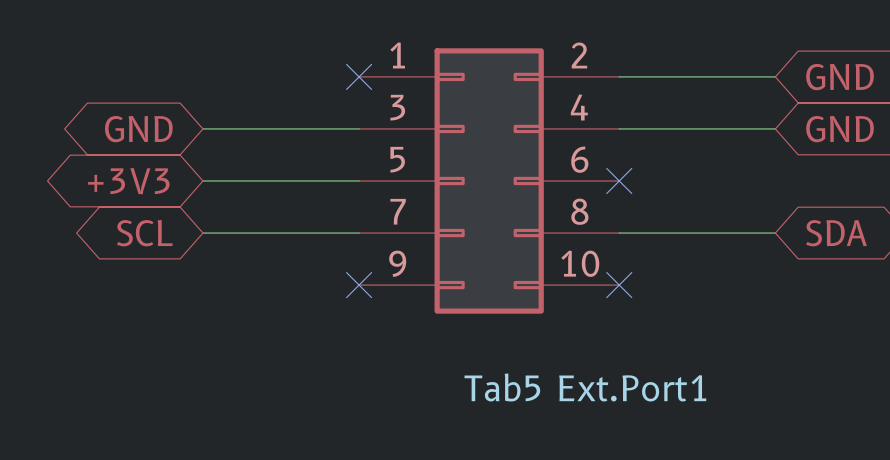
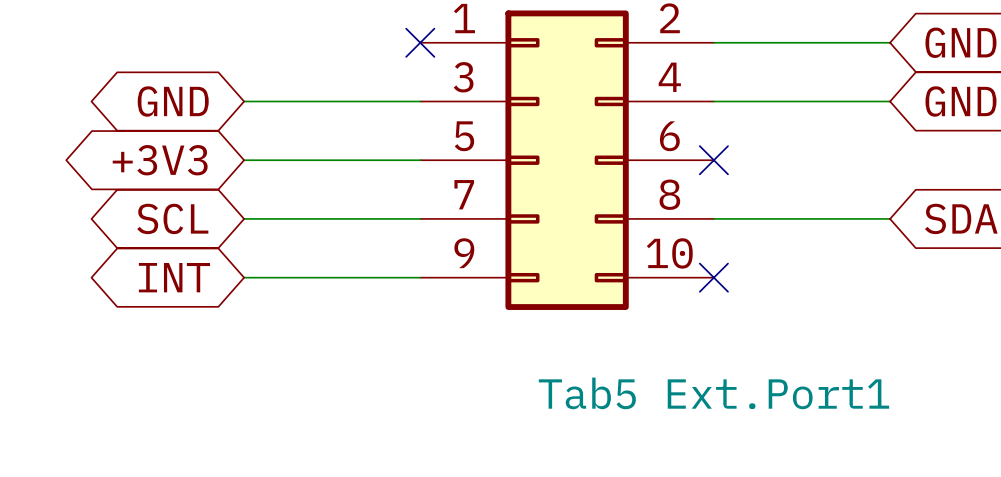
global label: none -> INT (174, 277)
wire: none -> (244, 277) (420, 277)
no-connect mark: (359, 285) -> none

